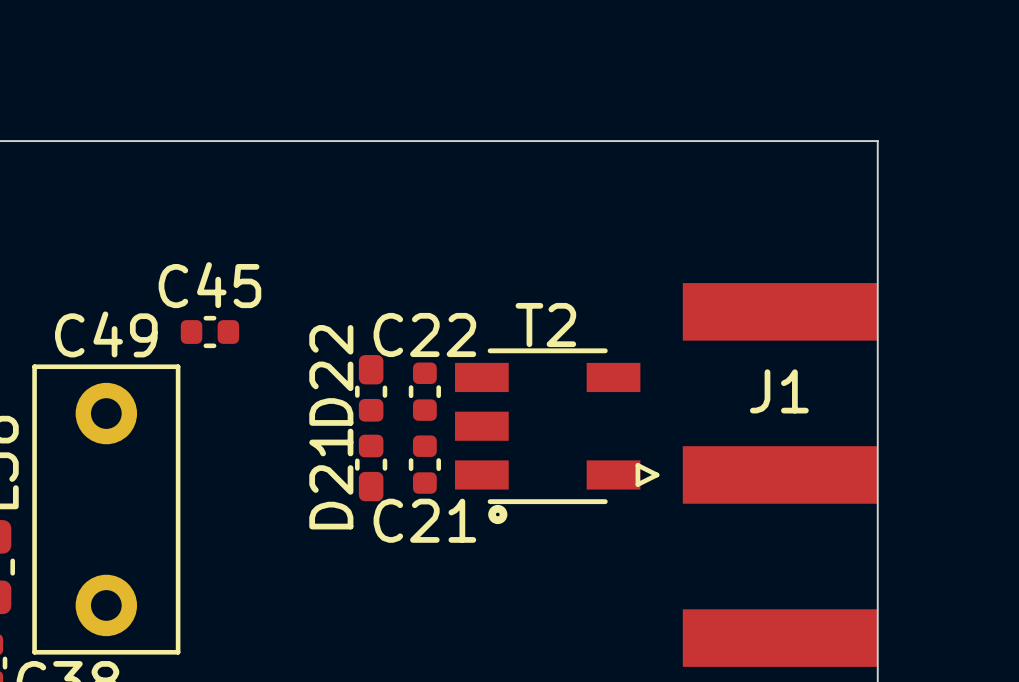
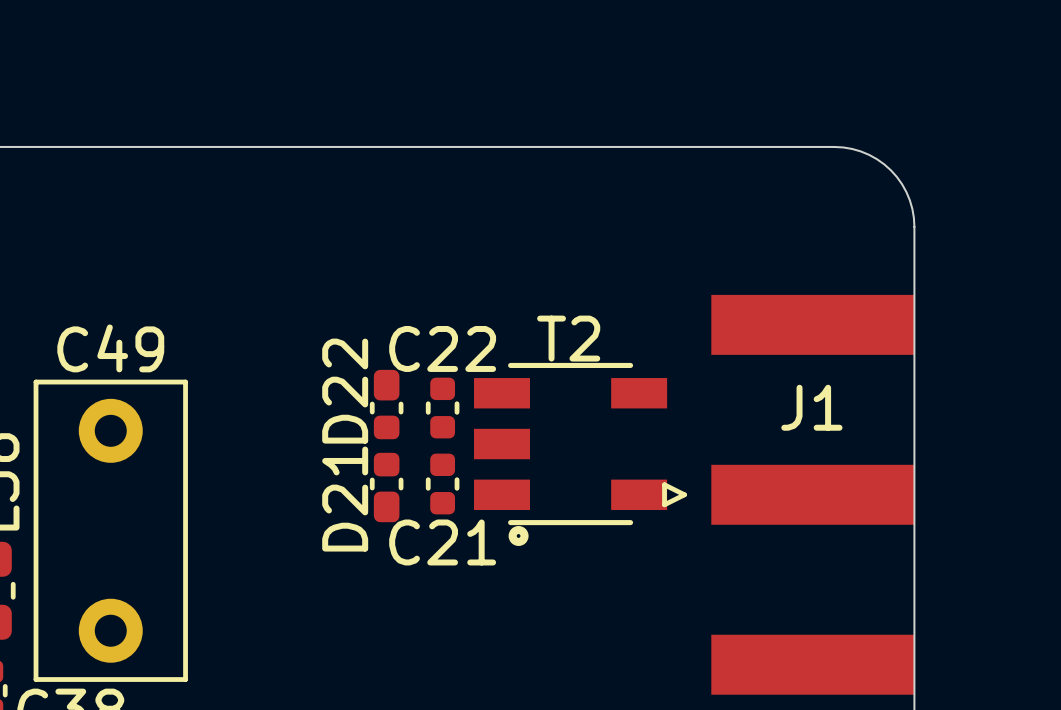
board edge: (801, 141) (877, 141) (877, 217) -> (834, 146) (860, 151) (876, 159) (890, 170) (906, 192) (912, 209) (914, 226)
C45: (209, 332) -> none

